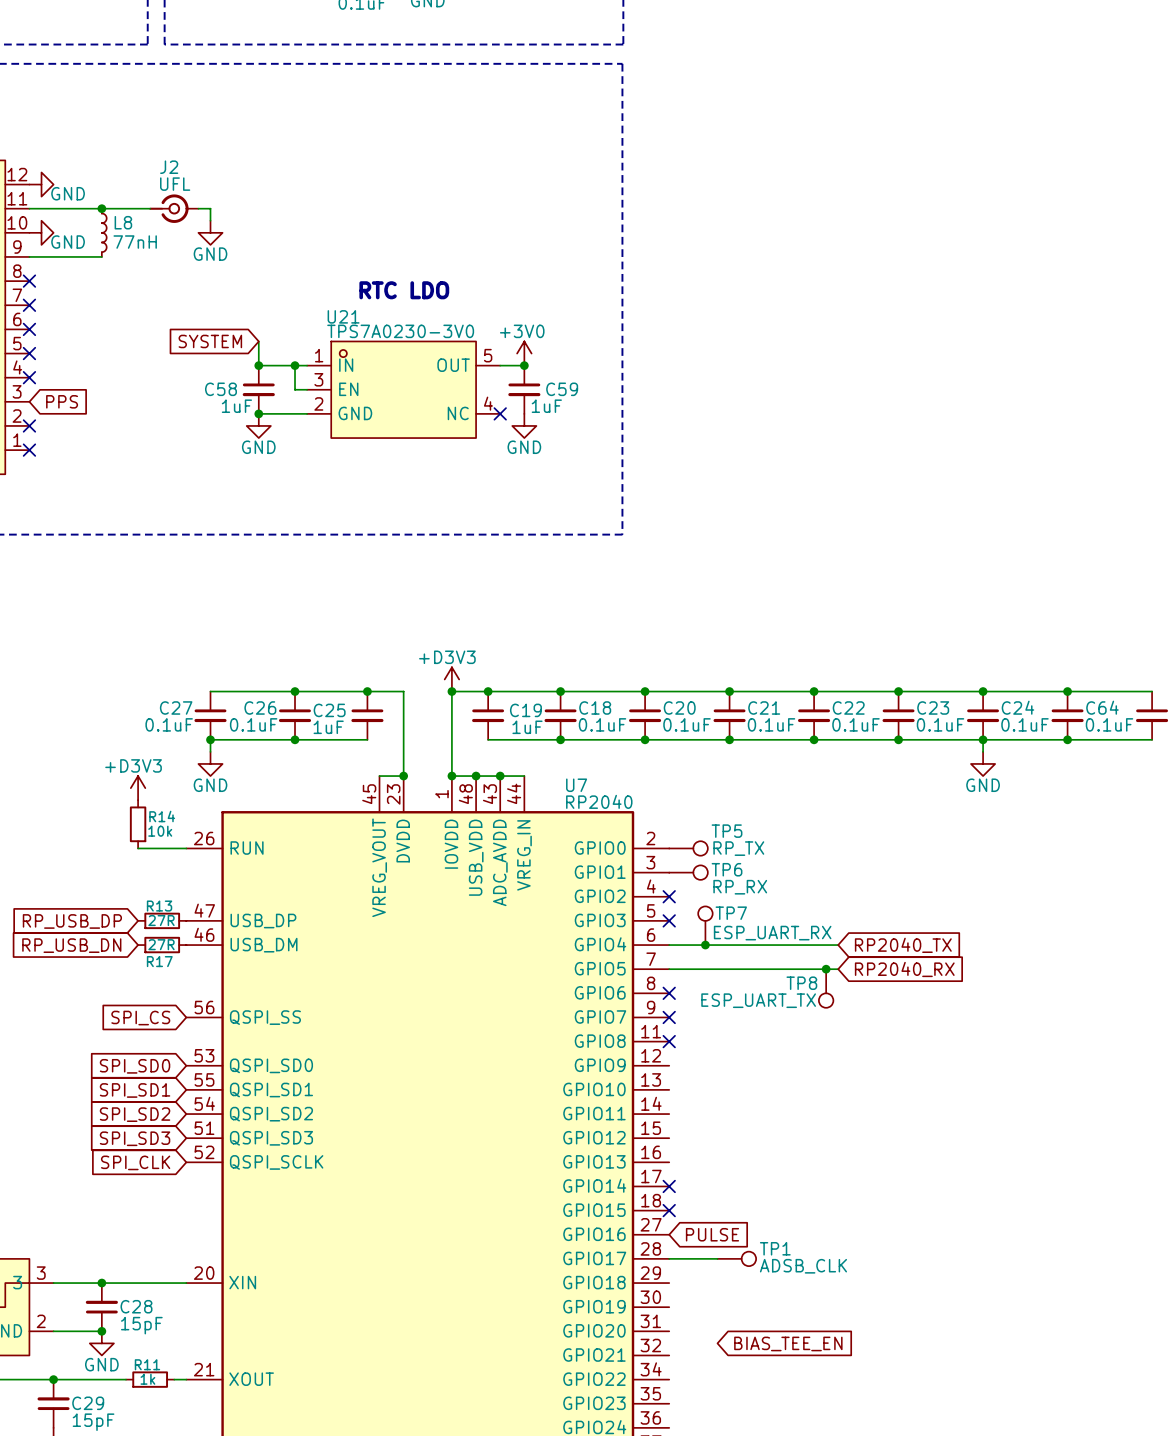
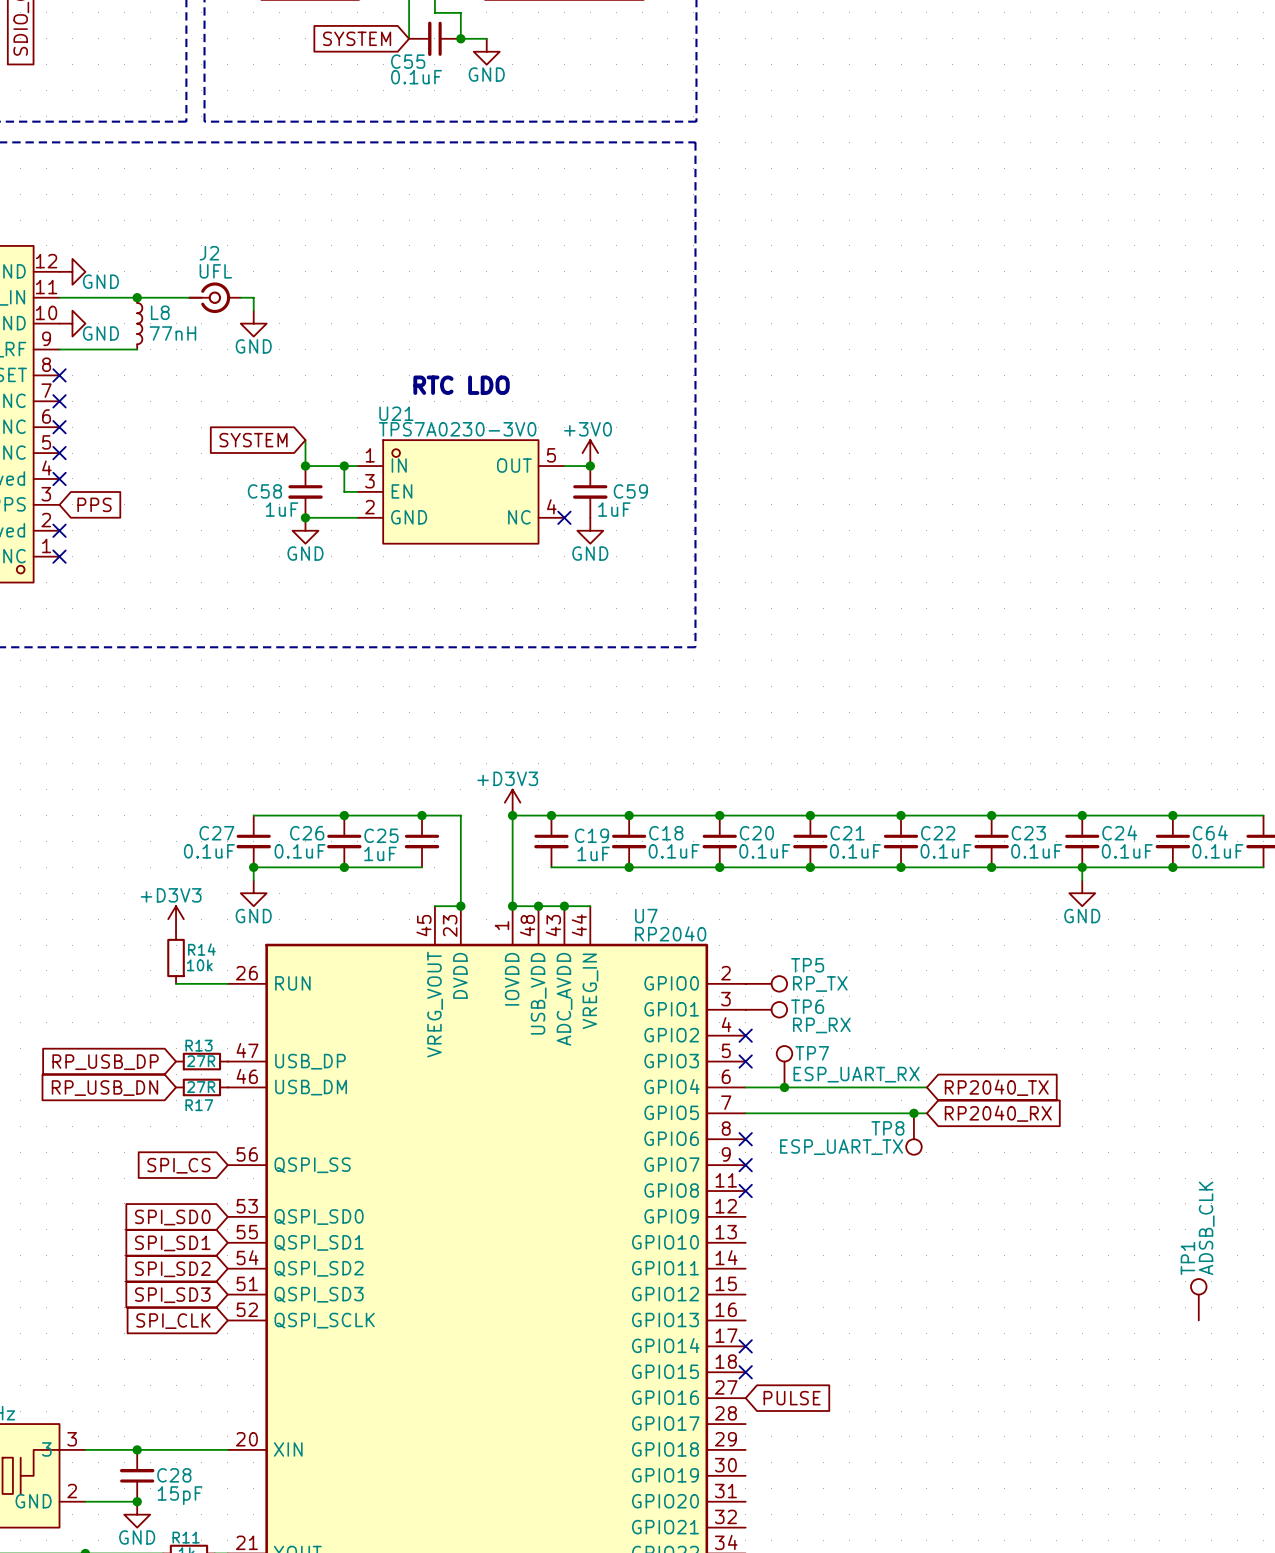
wire: (669, 1258) (717, 1258) -> none
TP1 position: (736, 1258) -> (1198, 1299)
TP1 rotation: 0° (748, 1258) -> 90° counterclockwise (1198, 1286)
global label: BIAS_TEE_EN (788, 1343) -> none

